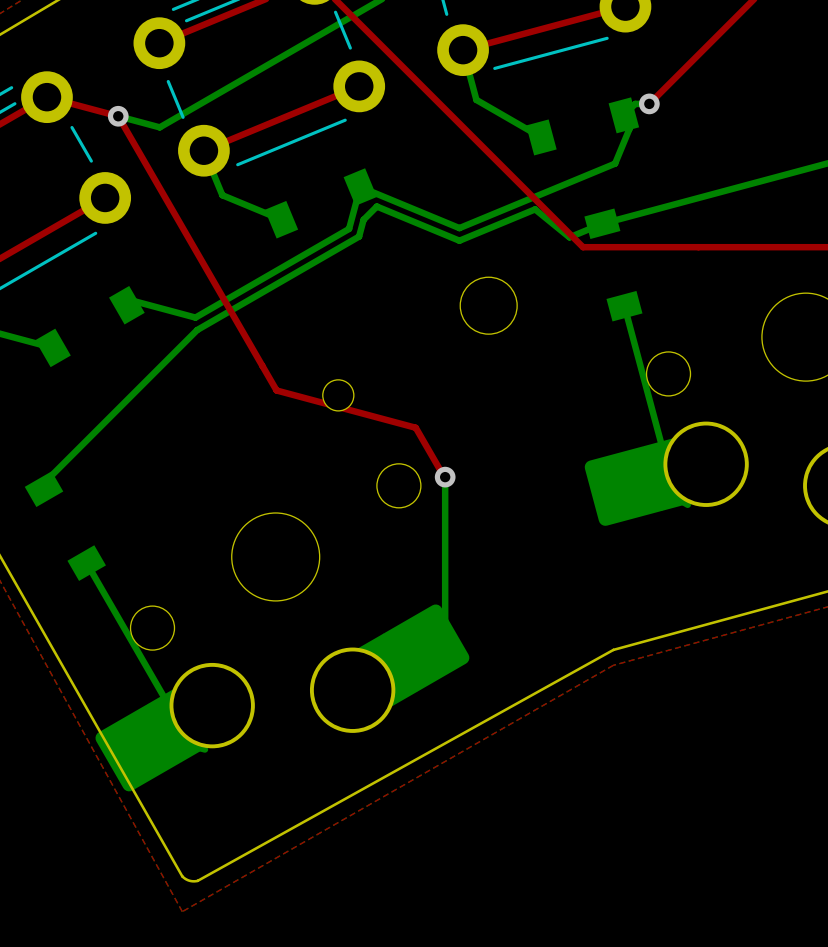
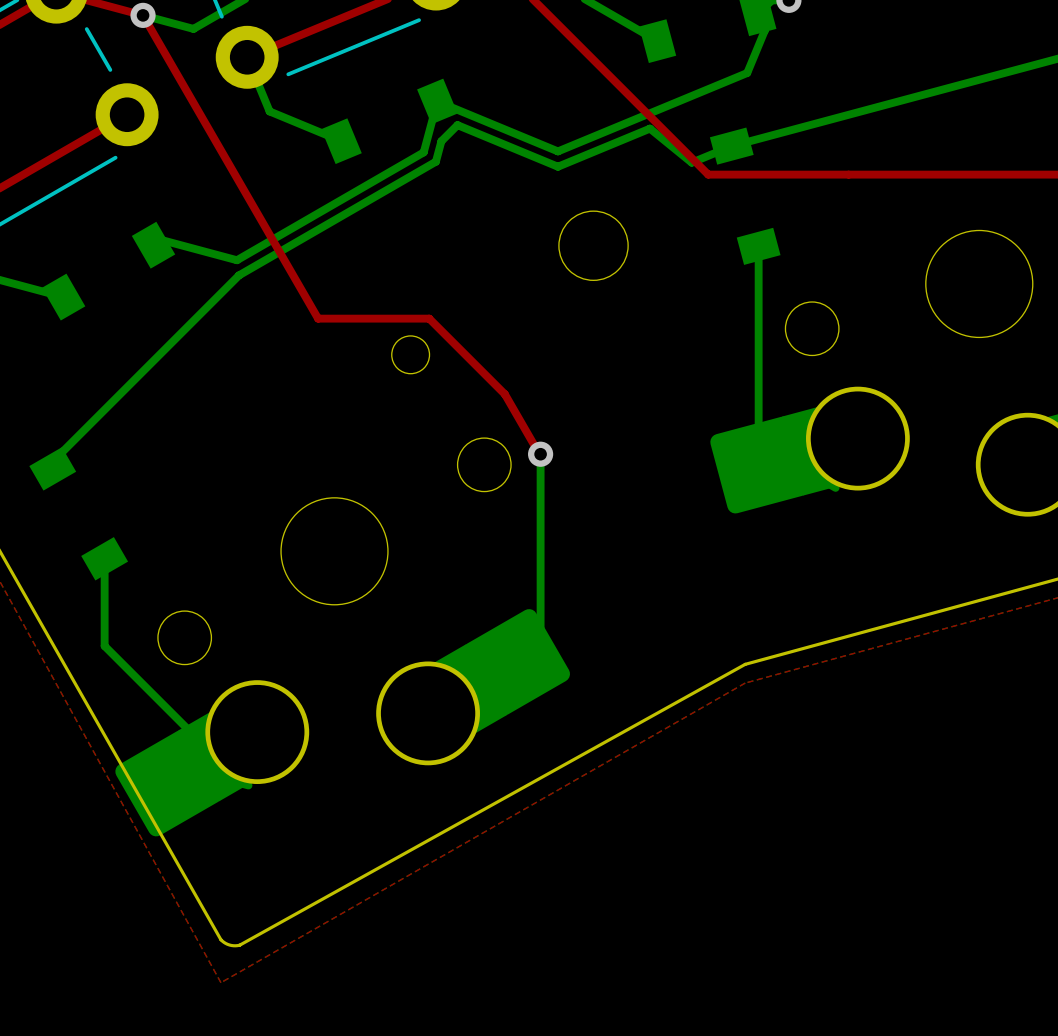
bottom track: (624, 306) (675, 497) -> (758, 246) (759, 465)
top track: (262, 365) (276, 390) (415, 427) -> (318, 318) (429, 318) (504, 394)
bottom track: (86, 563) (192, 746) -> (104, 558) (104, 646) (215, 756)

